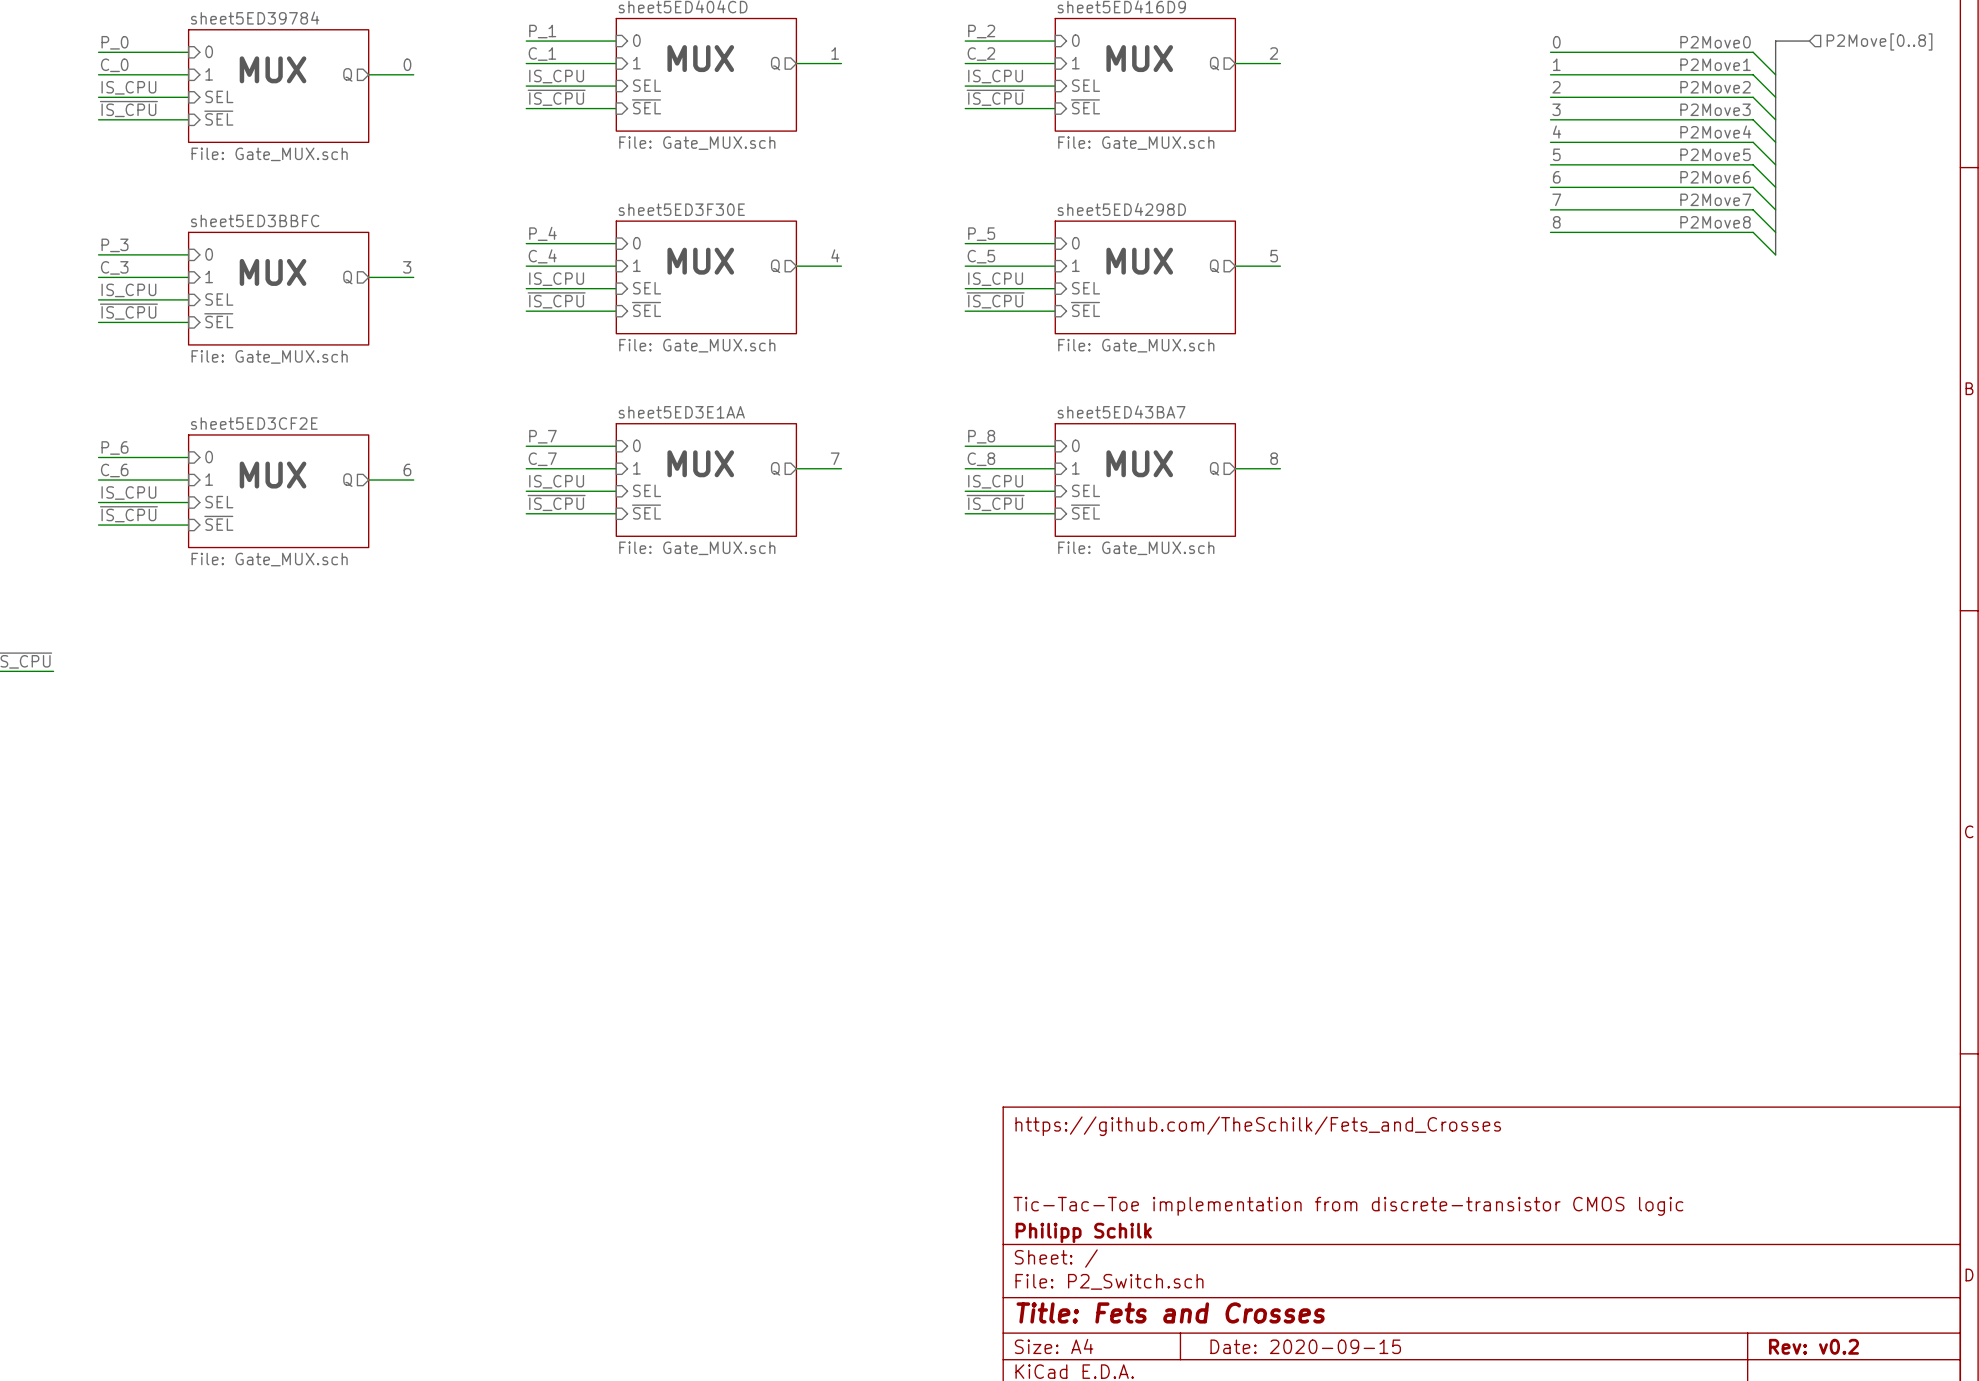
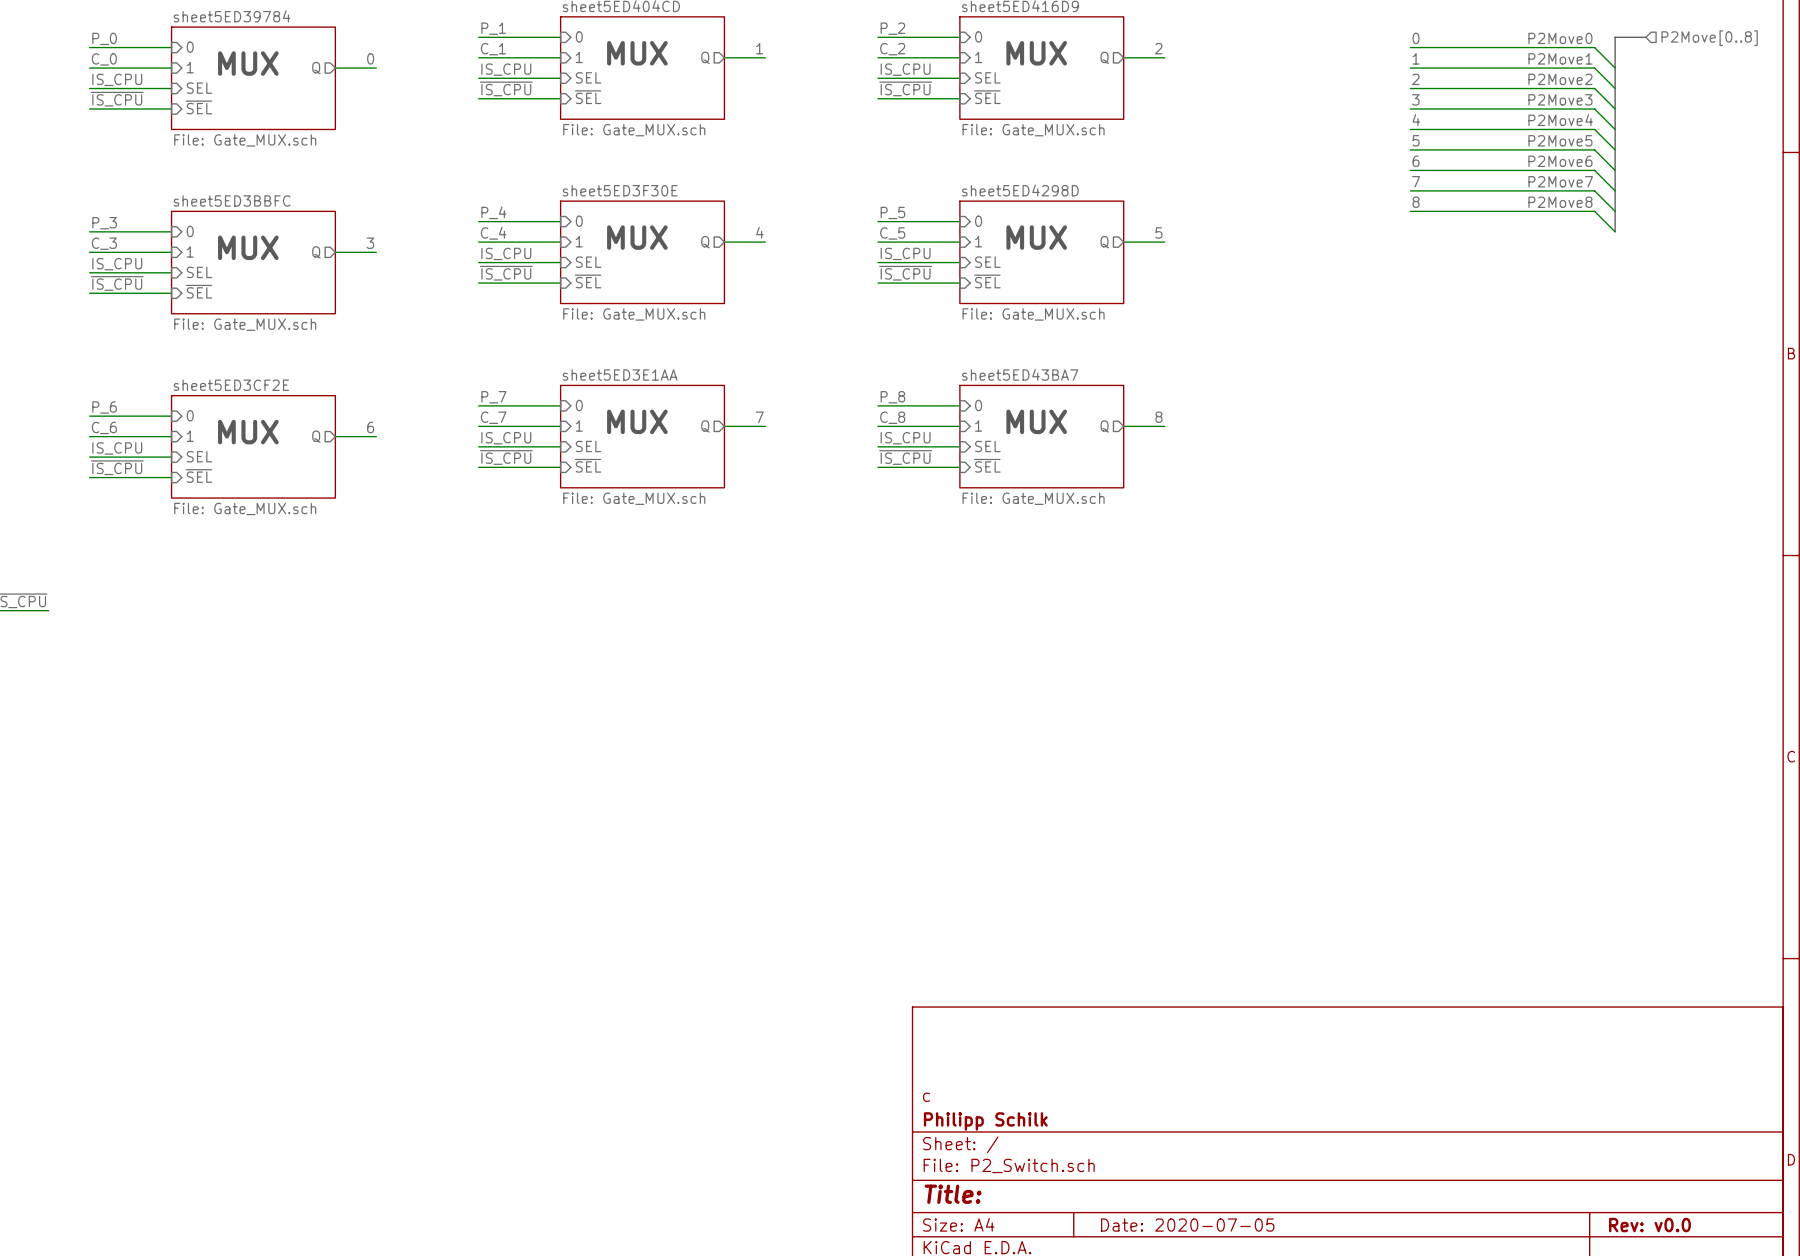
title block: https://github.com/TheSchilk/Fets_and_Crosses (1258, 1126) -> none
title block: Tic-Tac-Toe implementation from discrete-transistor CMOS logic (1348, 1206) -> c (926, 1097)
title block: Title: Fets and Crosses (1170, 1312) -> Title: (953, 1194)
title block: Date: 2020-09-15 (1305, 1346) -> Date: 2020-07-05 (1187, 1225)
title block: Rev: v0.2 (1813, 1346) -> Rev: v0.0 (1650, 1225)

